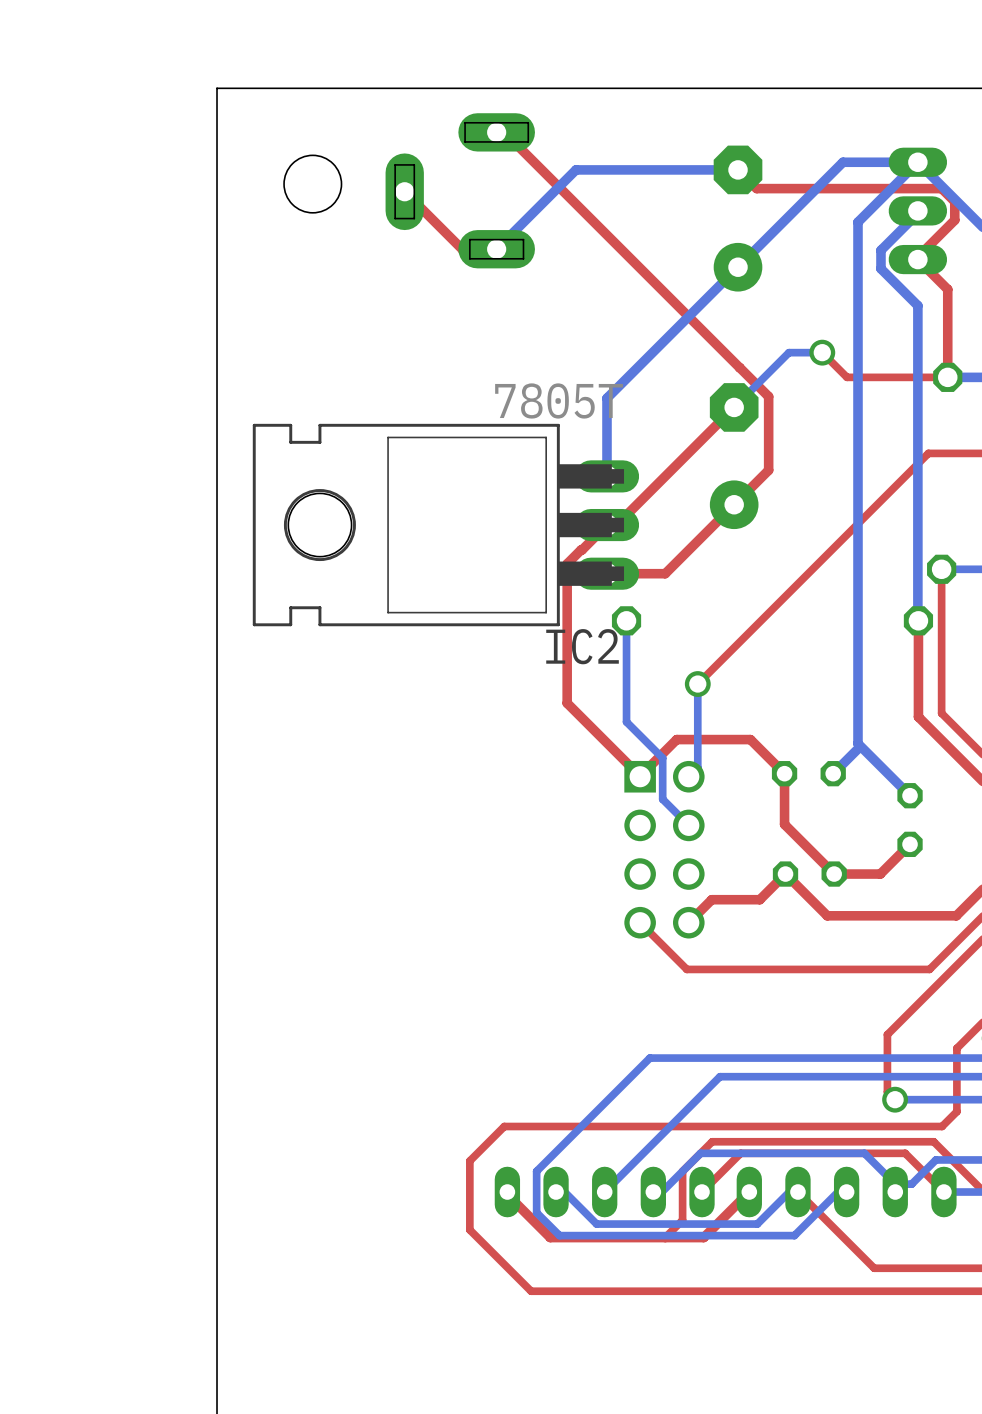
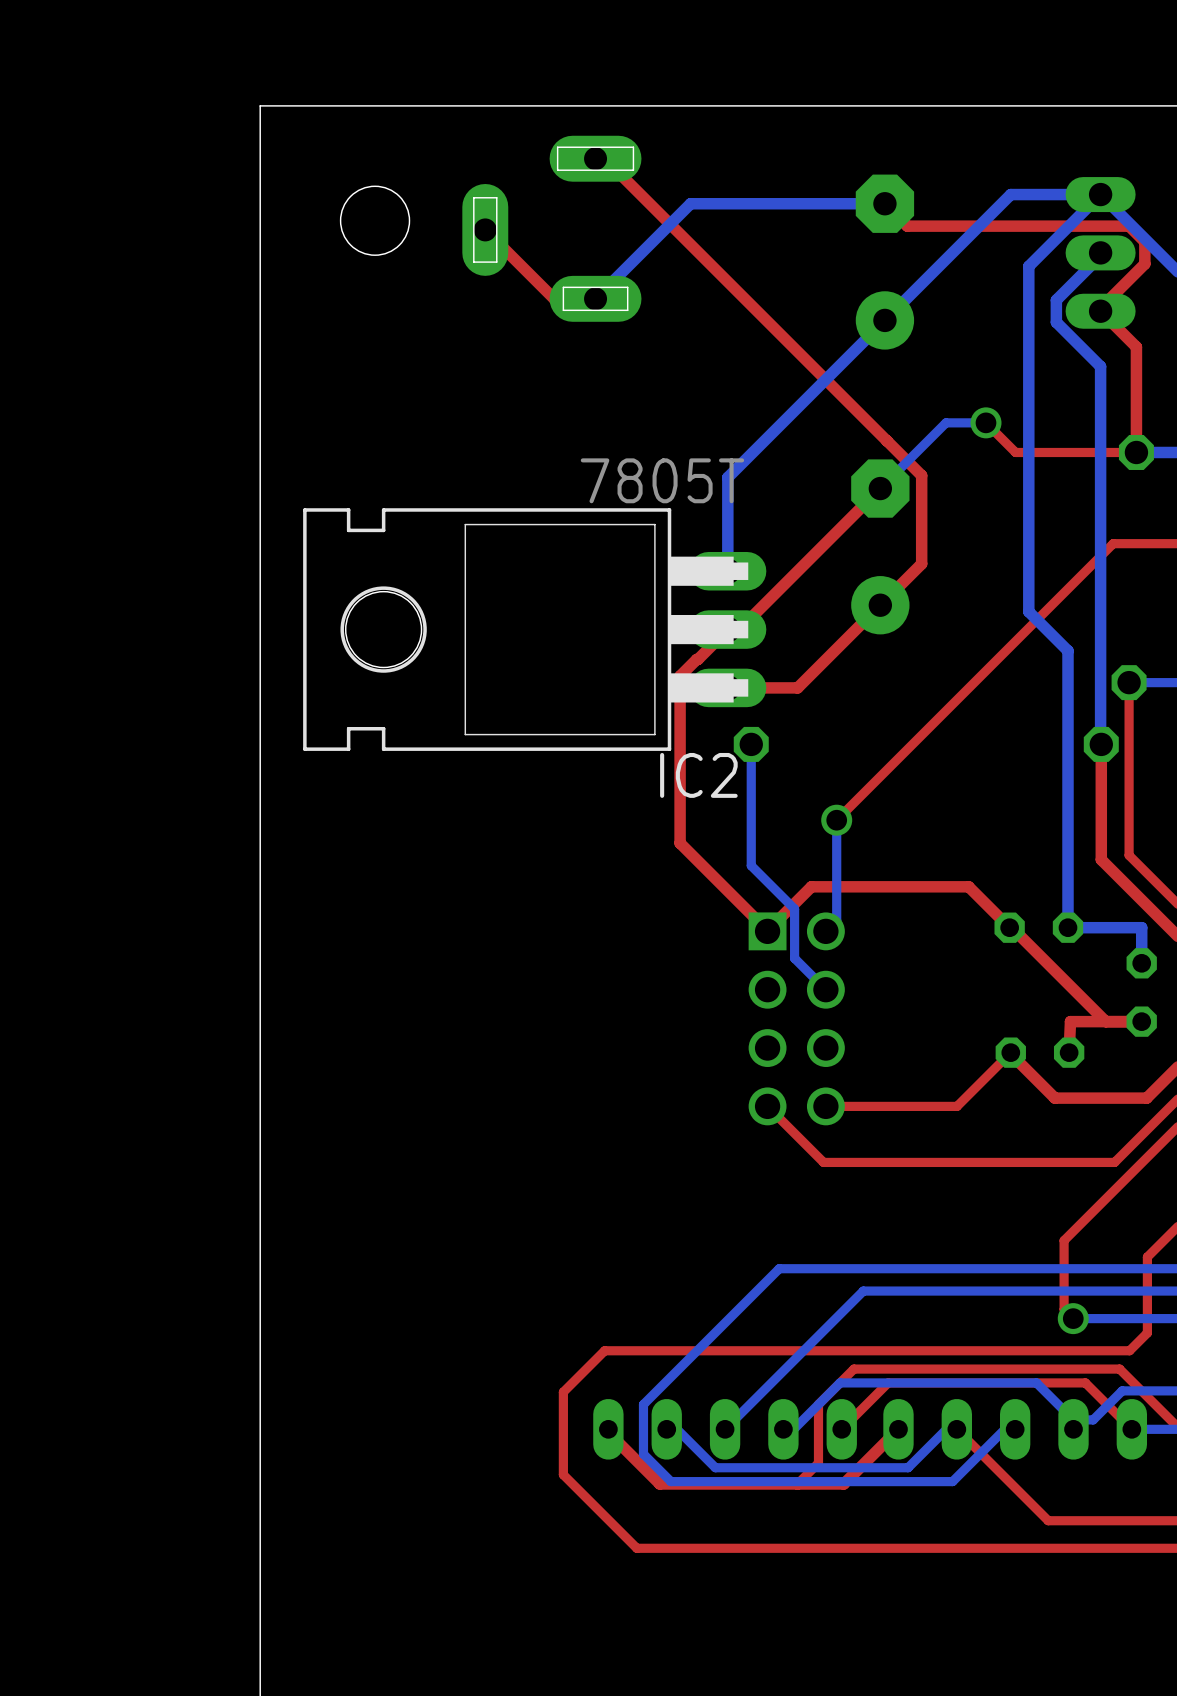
bottom track: (857, 510) (857, 743) (910, 795) -> (1028, 611) (1067, 650) (1067, 927) (1141, 927) (1141, 963)
top track: (750, 739) (784, 773) (784, 824) (834, 874) (880, 874) (910, 844) -> (899, 886) (968, 886) (1105, 1021)
bottom track: (857, 748) (833, 773) -> none
part: (808, 773) -> none
part: none -> (1038, 927)
part: (910, 820) -> none
part: none -> (1141, 992)
top track: none -> (1141, 1021) (1070, 1021) (1069, 1052)
part: (809, 874) -> none
part: none -> (1039, 1052)
top track: none -> (1010, 1053) (1054, 1098)
top track: (879, 915) (827, 915) (785, 874) (759, 899) (711, 899) (688, 922) -> (1010, 1052) (957, 1106) (825, 1106)

